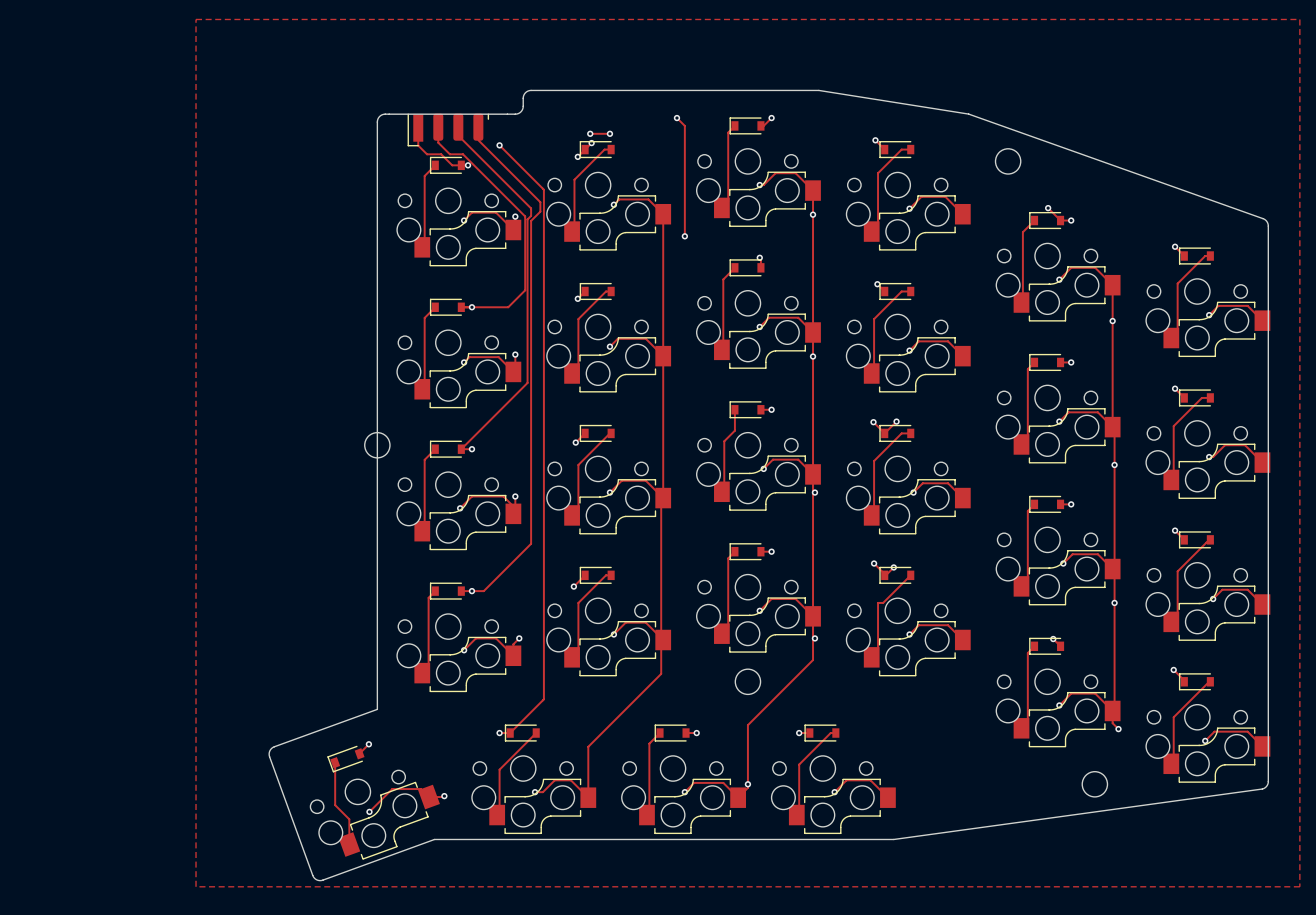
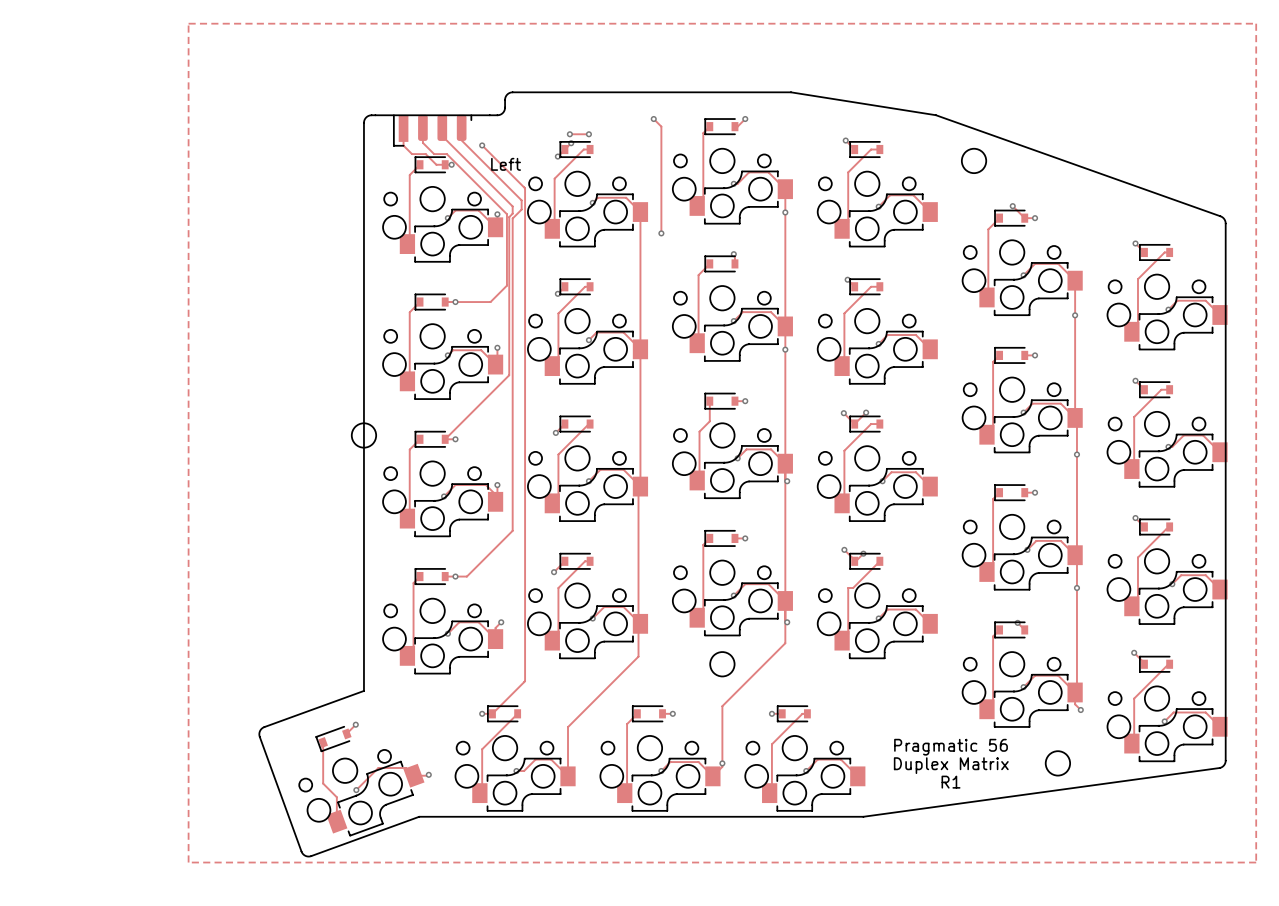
text: none -> Left (506, 164)
text: none -> Pragmatic 56 (951, 747)
text: none -> Duplex Matrix (951, 765)
text: none -> R1 (951, 782)

